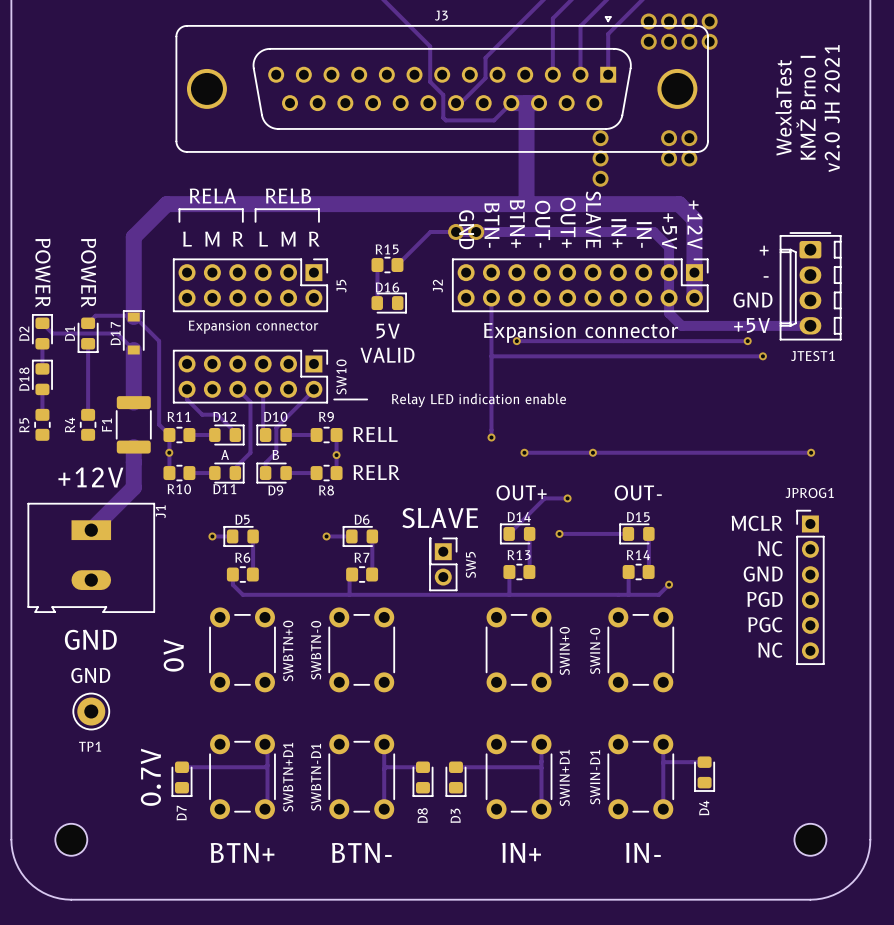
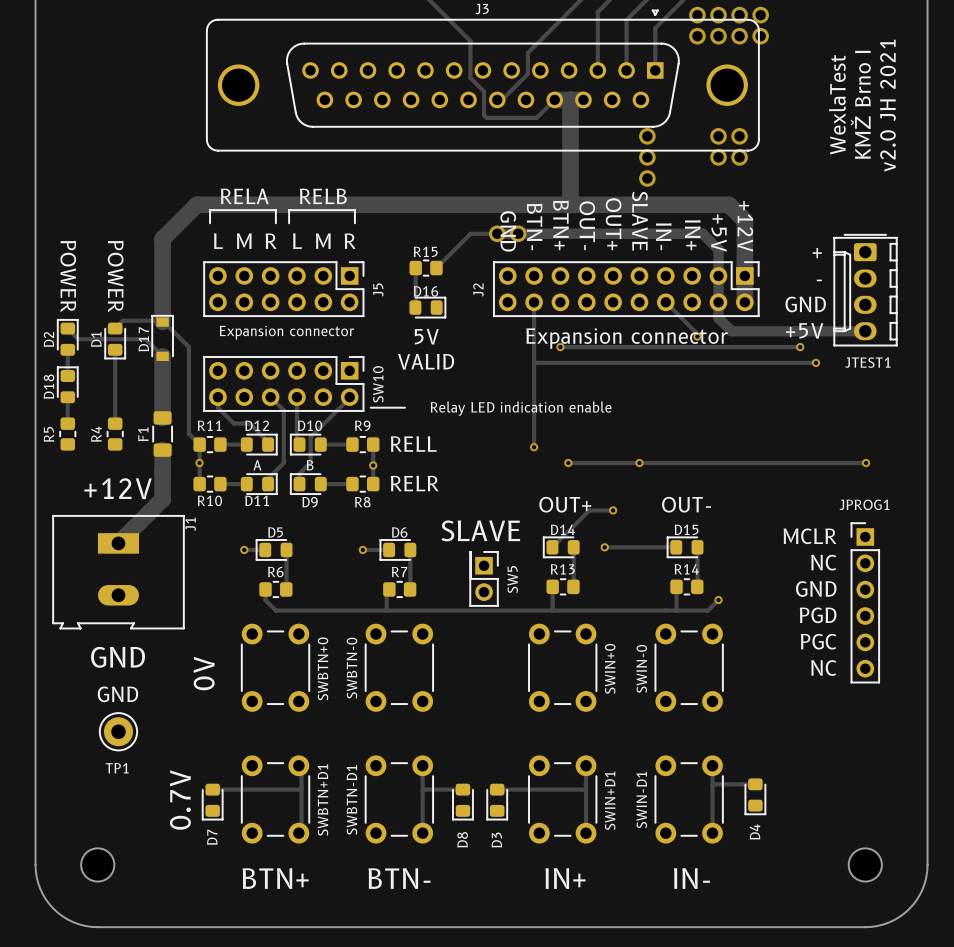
text: IN+ (618, 233) -> IN- (663, 236)
text: IN- (644, 234) -> IN+ (692, 235)
track: none -> (665, 302) (697, 333) (697, 336)
via: none -> (697, 336)
F1 footprint: [116, 396, 152, 454] -> [152, 411, 173, 457]

